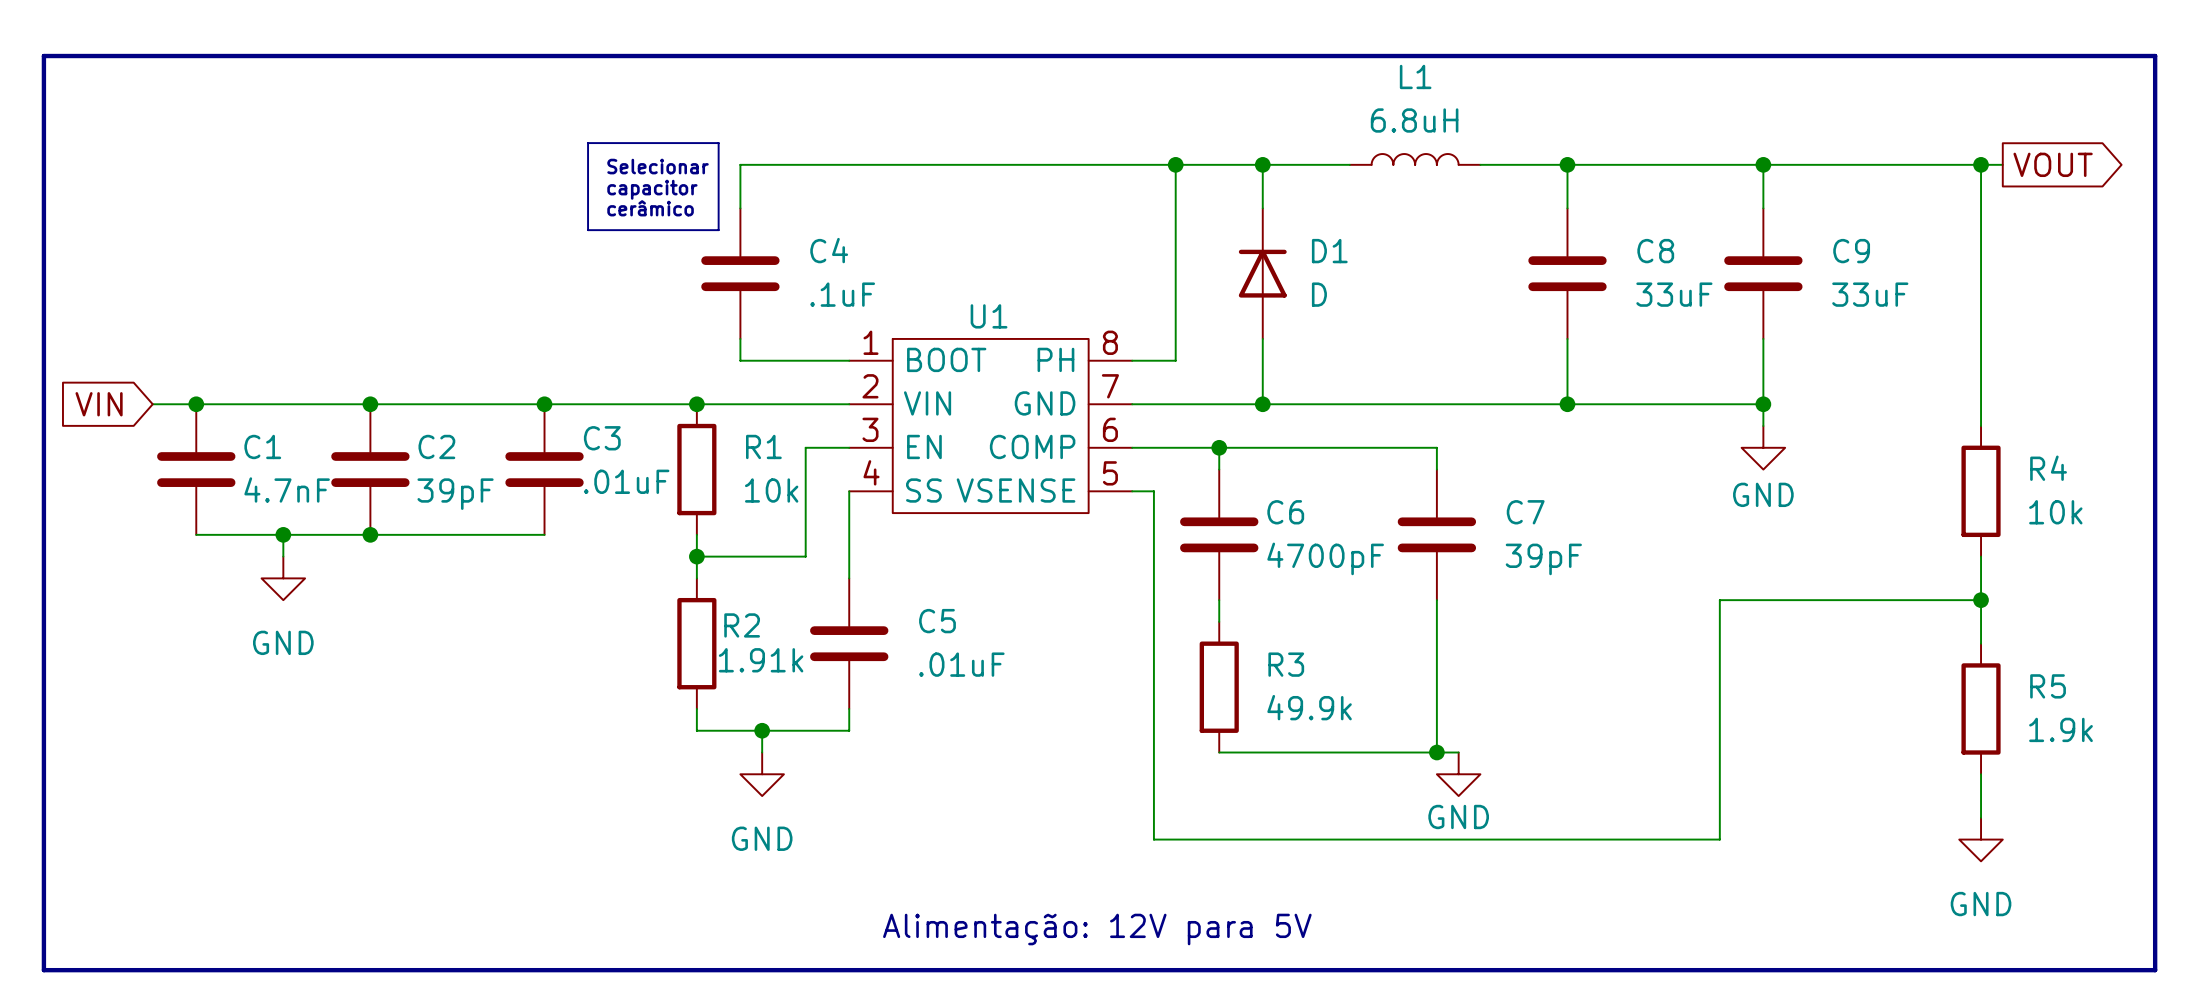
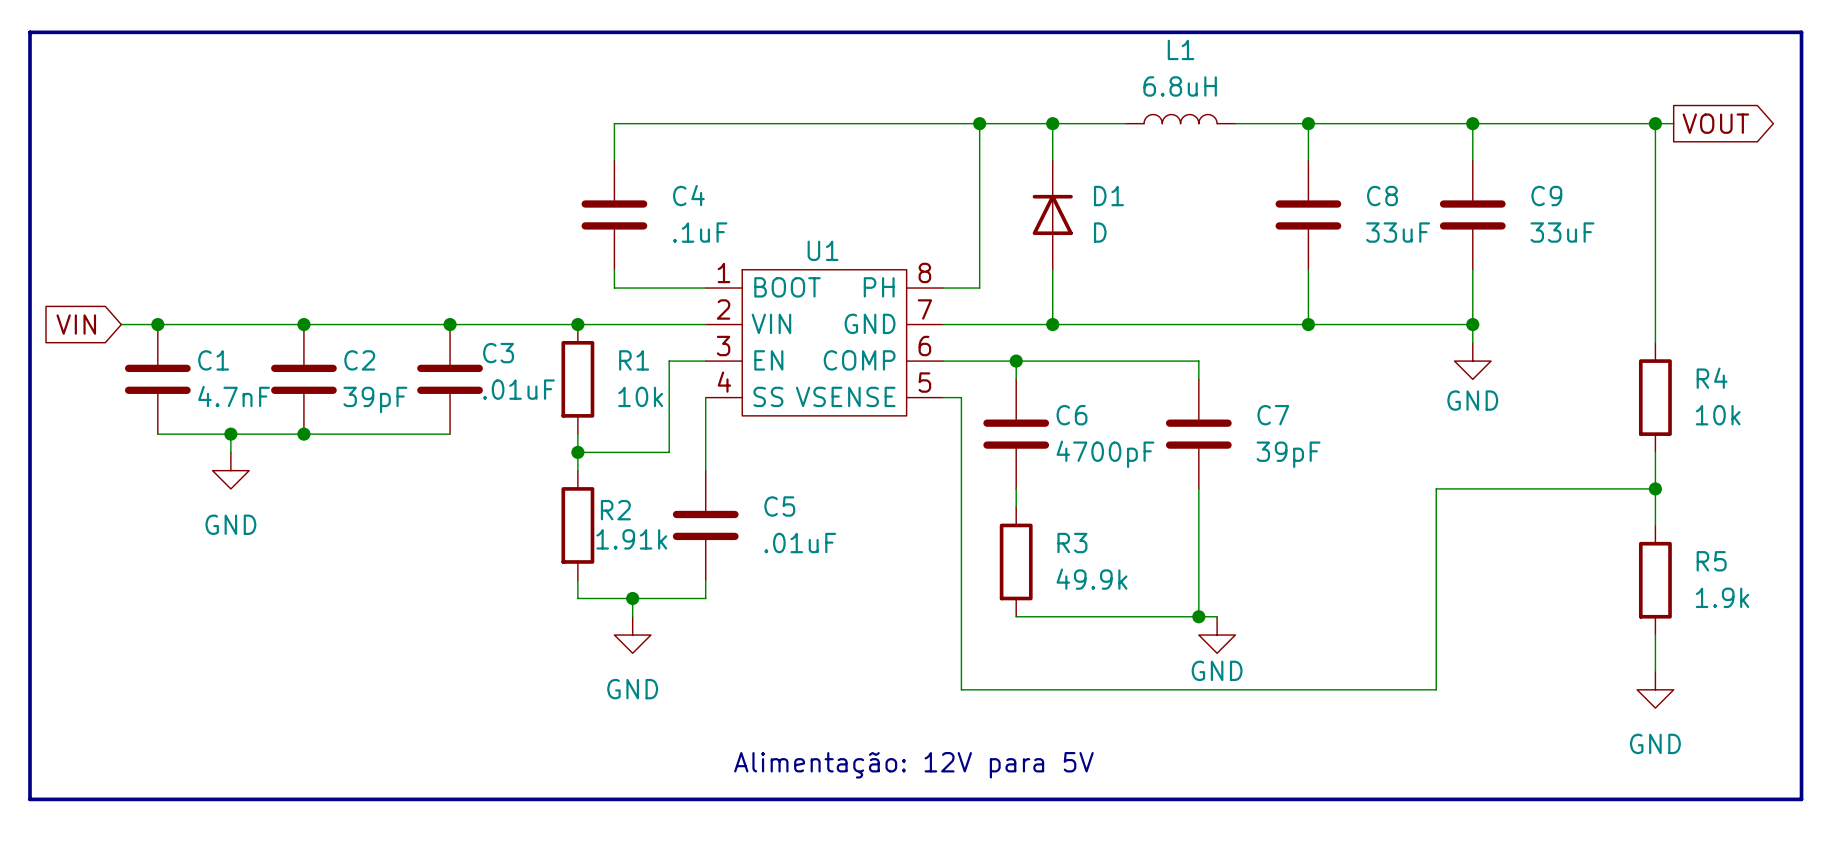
line: (588, 143) (718, 143) (718, 230) (588, 230) (588, 143) -> none
text: Selecionar (658, 166) -> none
text: capacitor (652, 189) -> none
text: cerâmico (650, 208) -> none

